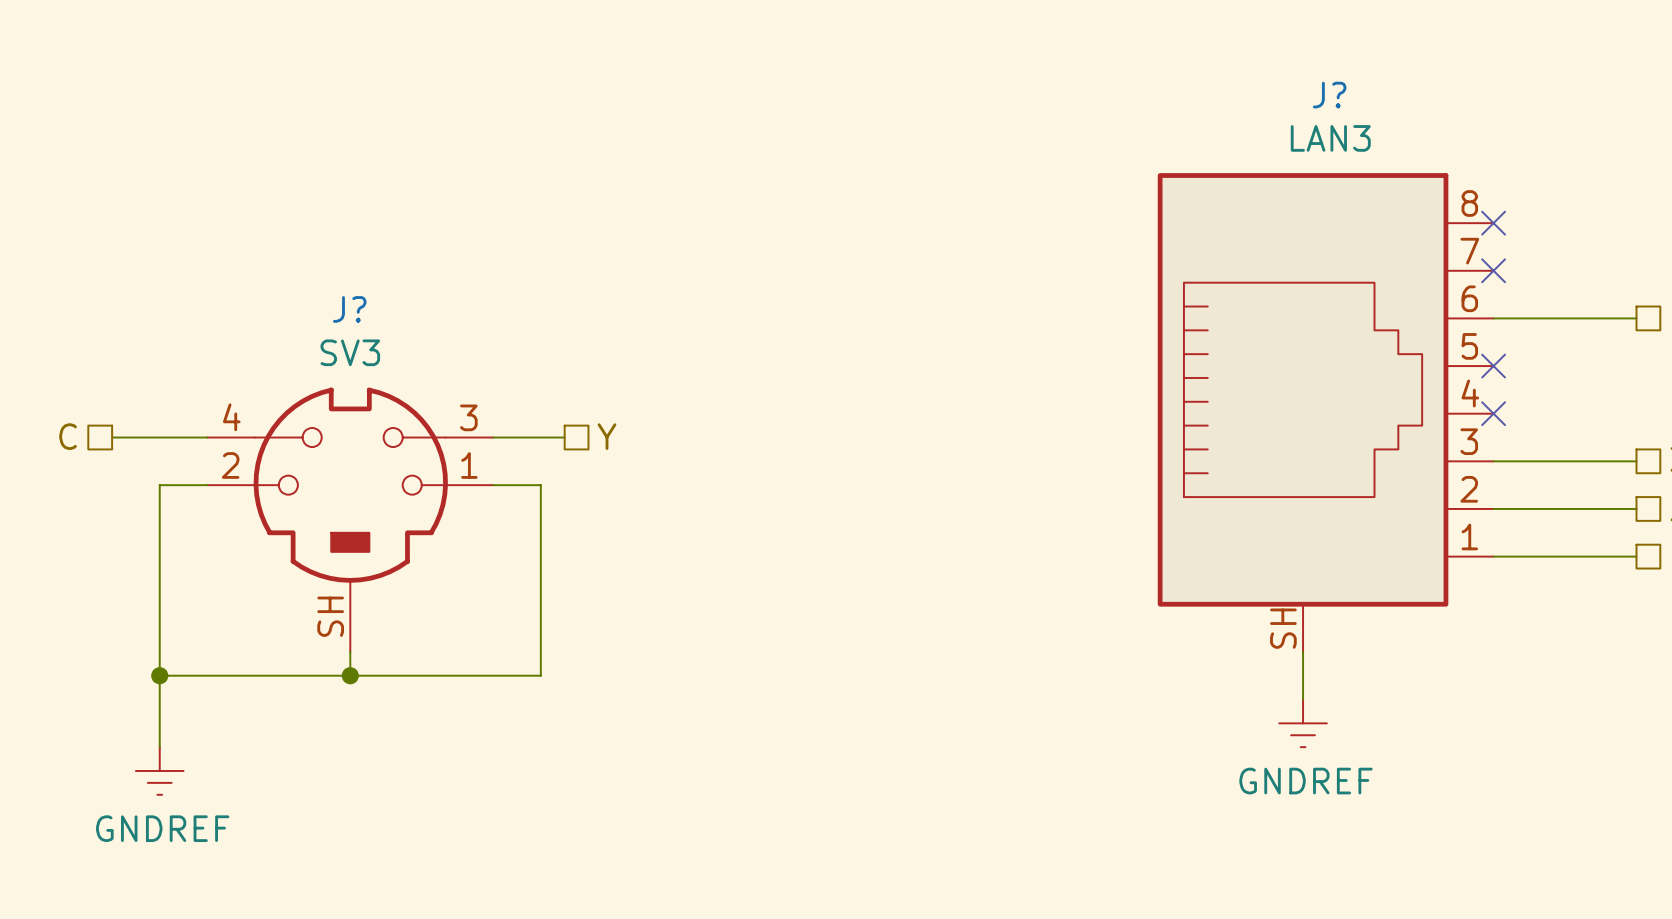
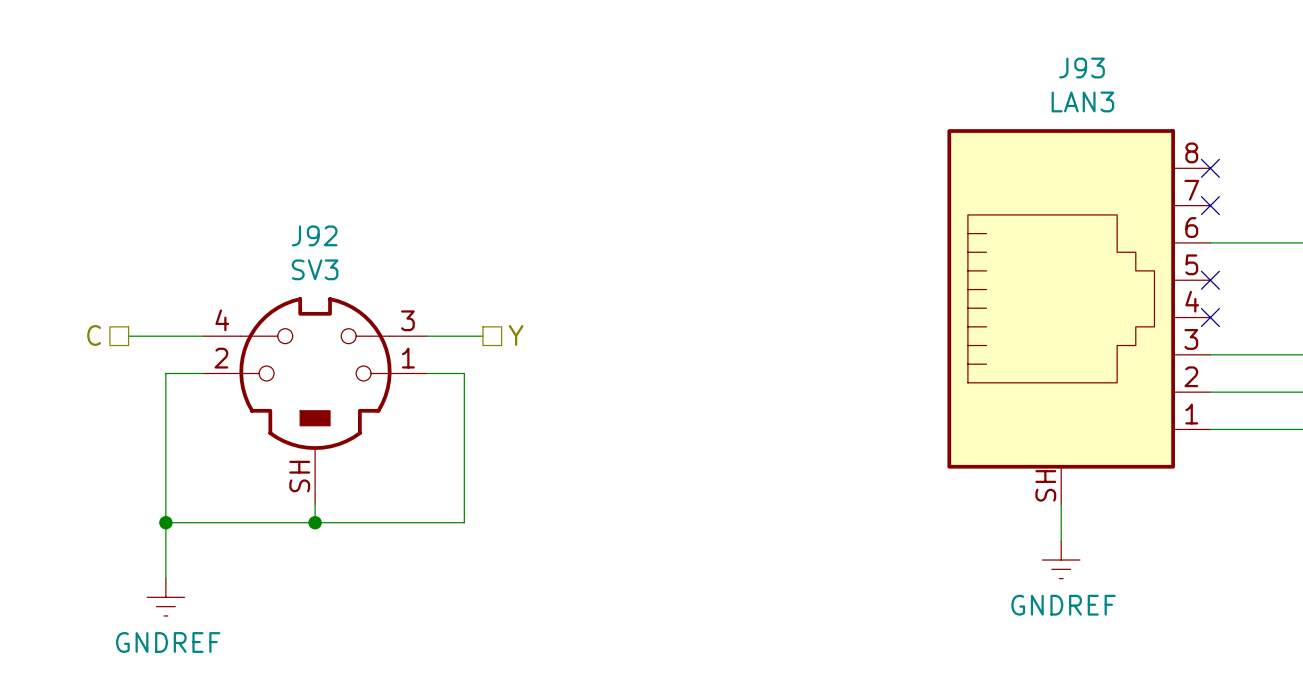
J? name: J? (1329, 95) -> J93 (1082, 68)
J? name: J? (349, 309) -> J92 (314, 235)

